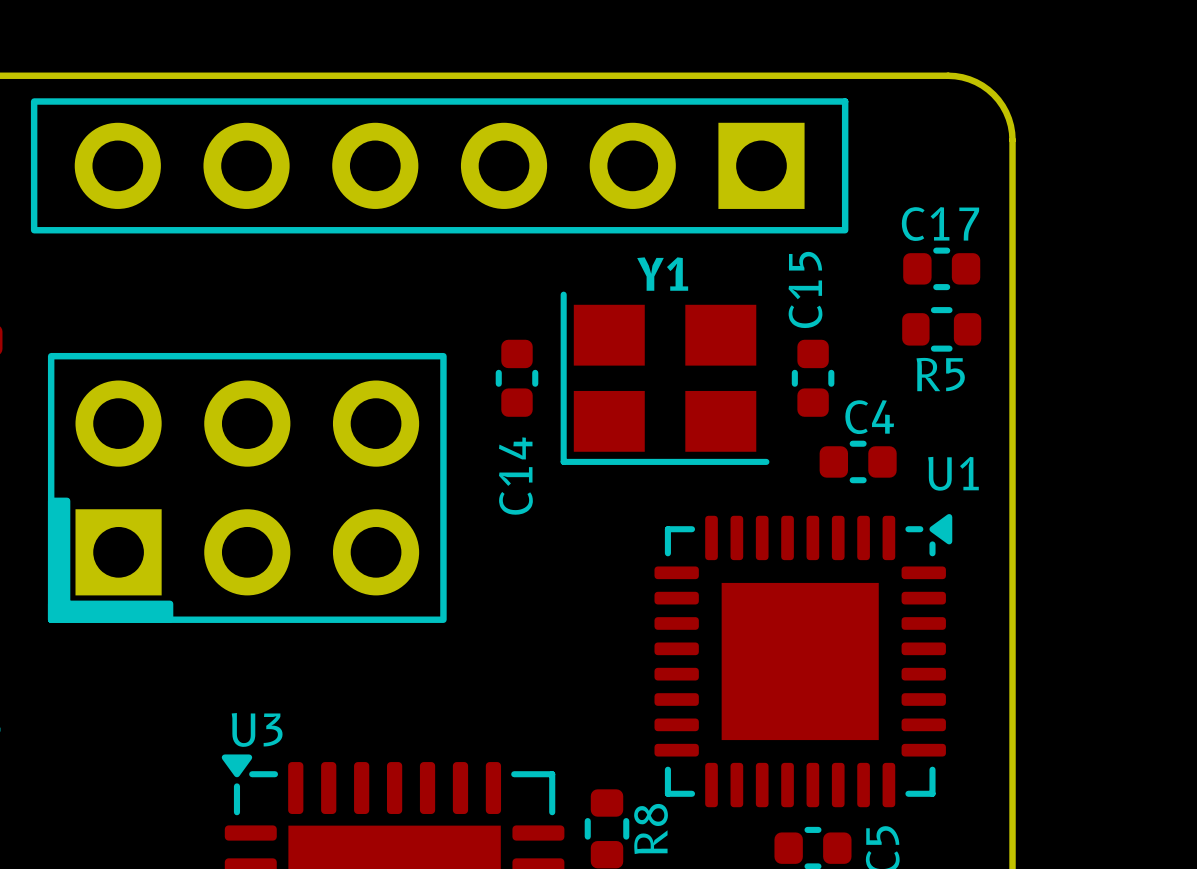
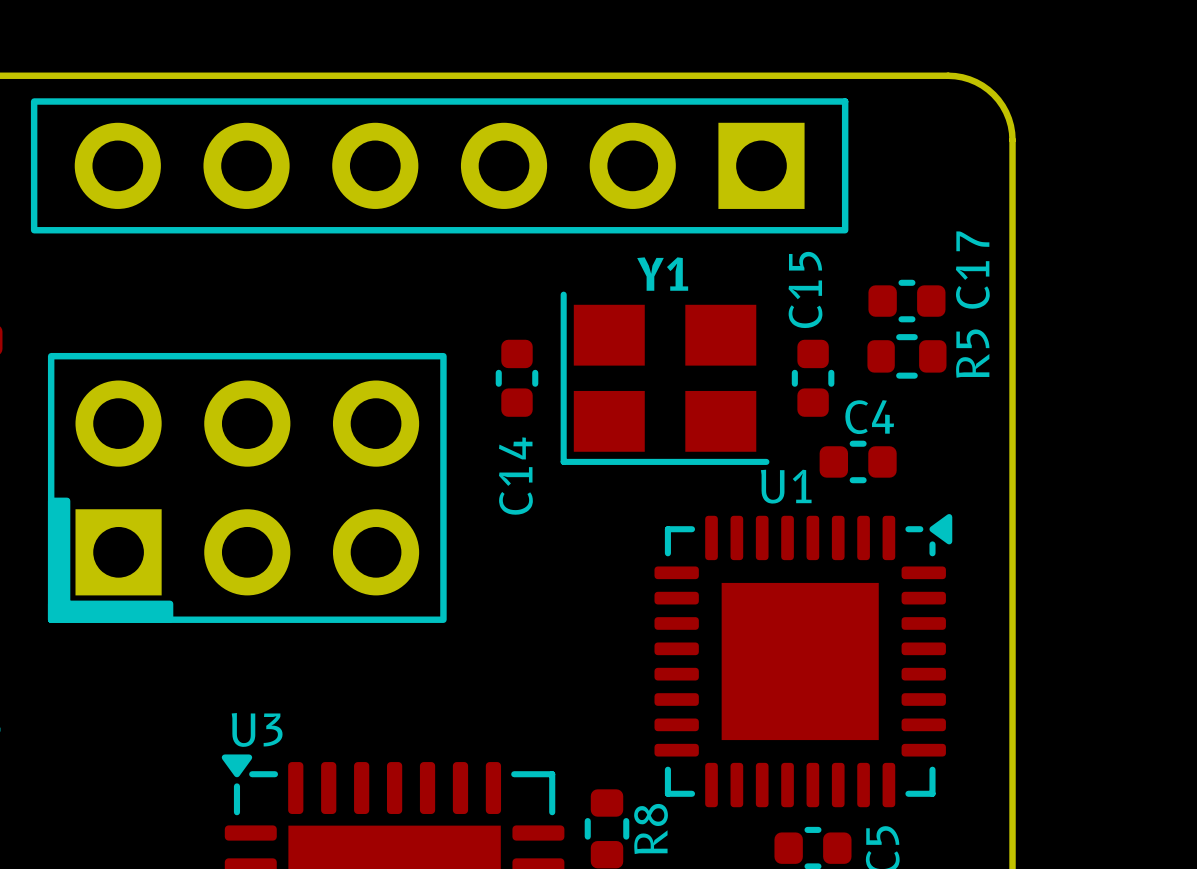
C17 name rotation: 0° (940, 224) -> 90° counterclockwise (972, 270)
C17 position: (941, 268) -> (906, 301)
R5 position: (941, 329) -> (906, 356)
R5 name rotation: 0° (940, 374) -> 90° counterclockwise (972, 353)
U1 name position: U1 (953, 473) -> U1 (786, 486)

